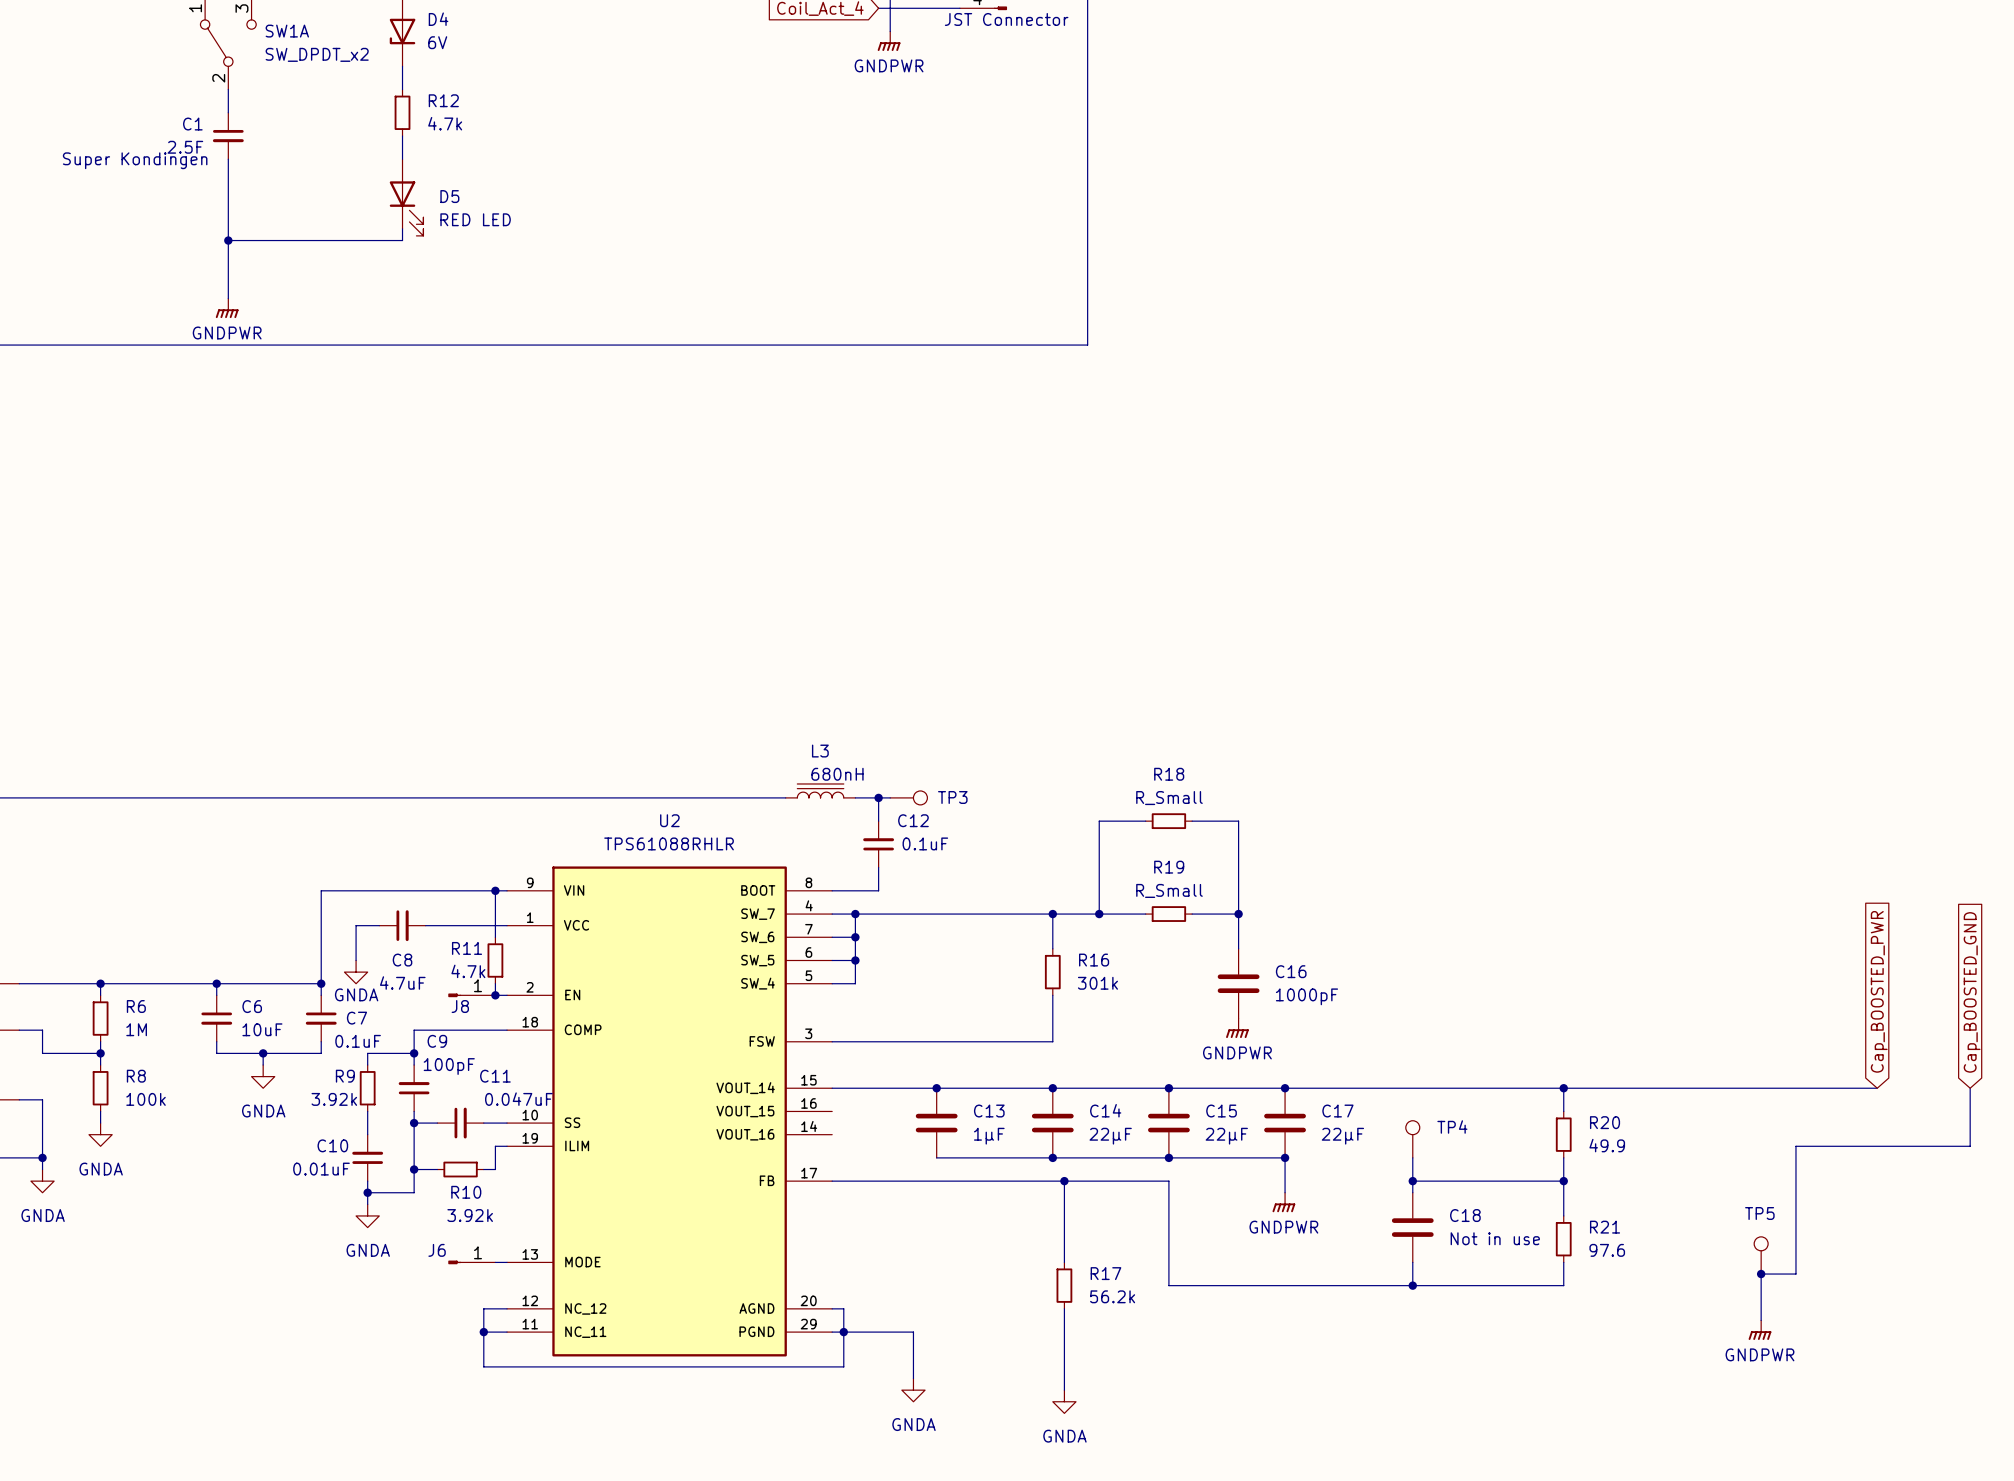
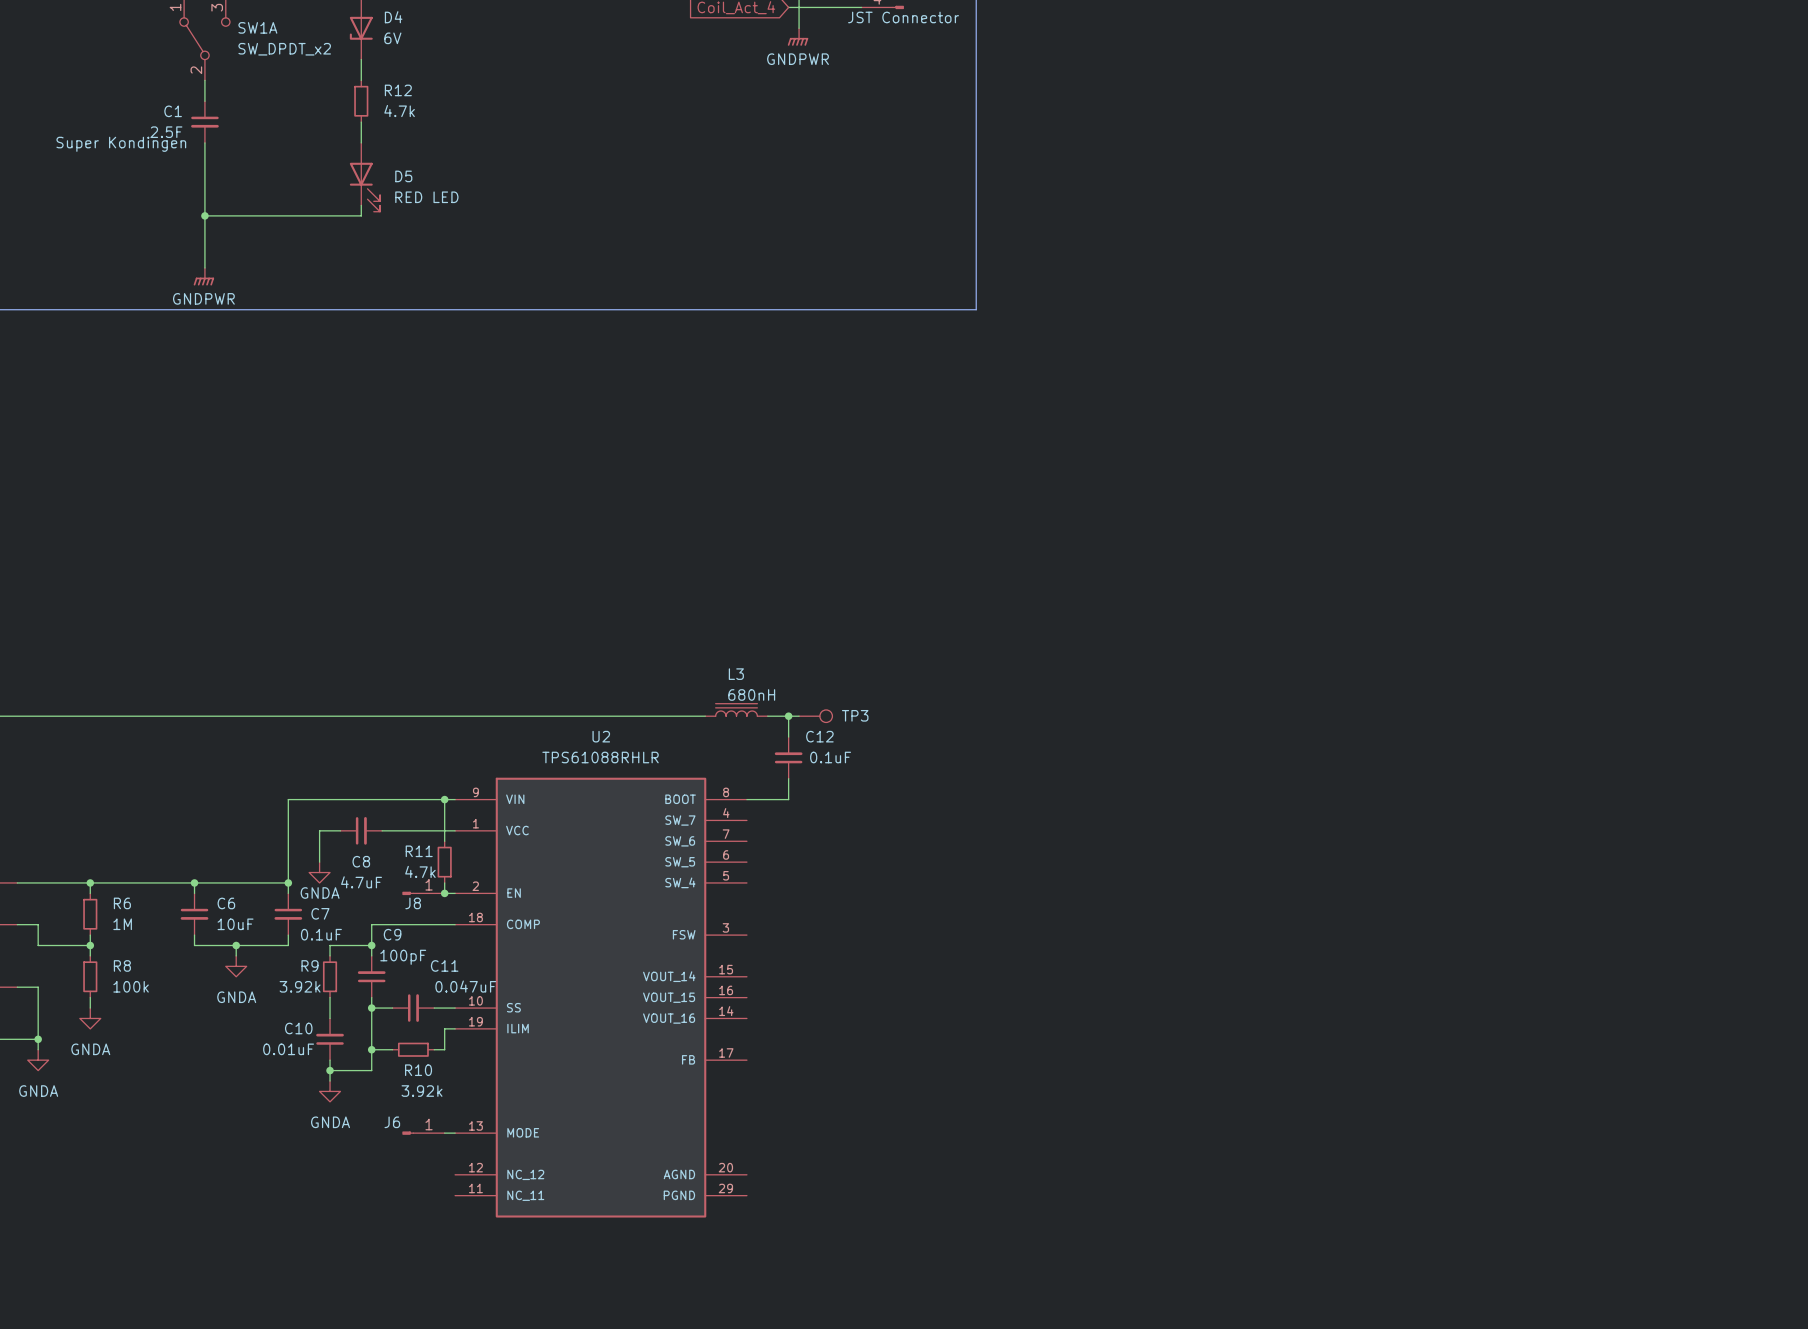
wire: (1145, 821) (1099, 821) (1099, 914) -> none
R18: R_Small (1168, 821) -> none
wire: (1192, 821) (1238, 821) (1238, 948) -> none
wire: (832, 914) (1145, 914) -> none
wire: (855, 914) (855, 983) (832, 983) -> none
junction: (855, 914) -> none
wire: (1052, 914) (1052, 948) -> none
junction: (1052, 914) -> none
junction: (1099, 914) -> none
R19: R_Small (1168, 914) -> none
wire: (1192, 914) (1238, 914) -> none
junction: (1238, 914) -> none
wire: (832, 937) (855, 937) -> none
junction: (855, 937) -> none
wire: (832, 960) (855, 960) -> none
junction: (855, 960) -> none
R16: 301k (1052, 972) -> none
C16: 1000pF (1238, 983) -> none
global label: Cap_BOOSTED_PWR (1879, 991) -> none
global label: Cap_BOOSTED_GND (1972, 992) -> none
wire: (1052, 995) (1052, 1041) (832, 1041) -> none
power symbol: GNDPWR (1237, 1028) -> none
wire: (832, 1088) (1877, 1088) -> none
junction: (936, 1088) -> none
junction: (1052, 1088) -> none
junction: (1168, 1088) -> none
junction: (1285, 1088) -> none
wire: (1563, 1088) (1563, 1111) -> none
junction: (1563, 1088) -> none
wire: (1970, 1088) (1970, 1146) (1795, 1146) (1795, 1274) (1761, 1274) (1761, 1320) -> none
C13: 1µF (936, 1123) -> none
C14: 22µF (1052, 1123) -> none
C15: 22µF (1168, 1123) -> none
C17: 22µF (1285, 1123) -> none
R20: 49.9 (1563, 1134) -> none
TP4: (1412, 1139) -> none
wire: (936, 1157) (1285, 1157) (1285, 1192) -> none
junction: (1052, 1157) -> none
junction: (1168, 1157) -> none
junction: (1285, 1157) -> none
wire: (1412, 1157) (1412, 1192) -> none
wire: (1563, 1157) (1563, 1215) -> none
wire: (832, 1181) (1168, 1181) (1168, 1285) (1563, 1285) (1563, 1262) -> none
wire: (1064, 1181) (1064, 1262) -> none
junction: (1064, 1181) -> none
wire: (1412, 1181) (1563, 1181) -> none
junction: (1412, 1181) -> none
junction: (1563, 1181) -> none
power symbol: GNDPWR (1283, 1202) -> none
C18: Not in use (1412, 1227) -> none
R21: 97.6 (1563, 1239) -> none
TP5: (1761, 1255) -> none
wire: (1412, 1262) (1412, 1285) -> none
junction: (1761, 1274) -> none
R17: 56.2k (1064, 1285) -> none
junction: (1412, 1285) -> none
wire: (507, 1308) (483, 1308) (483, 1366) (843, 1366) (843, 1308) (832, 1308) -> none
wire: (1064, 1308) (1064, 1390) -> none
power symbol: GNDPWR (1759, 1330) -> none
wire: (483, 1332) (507, 1332) -> none
junction: (483, 1332) -> none
wire: (832, 1332) (913, 1332) (913, 1378) -> none
junction: (843, 1332) -> none
power symbol: GNDA (913, 1390) -> none
power symbol: GNDA (1064, 1401) -> none

